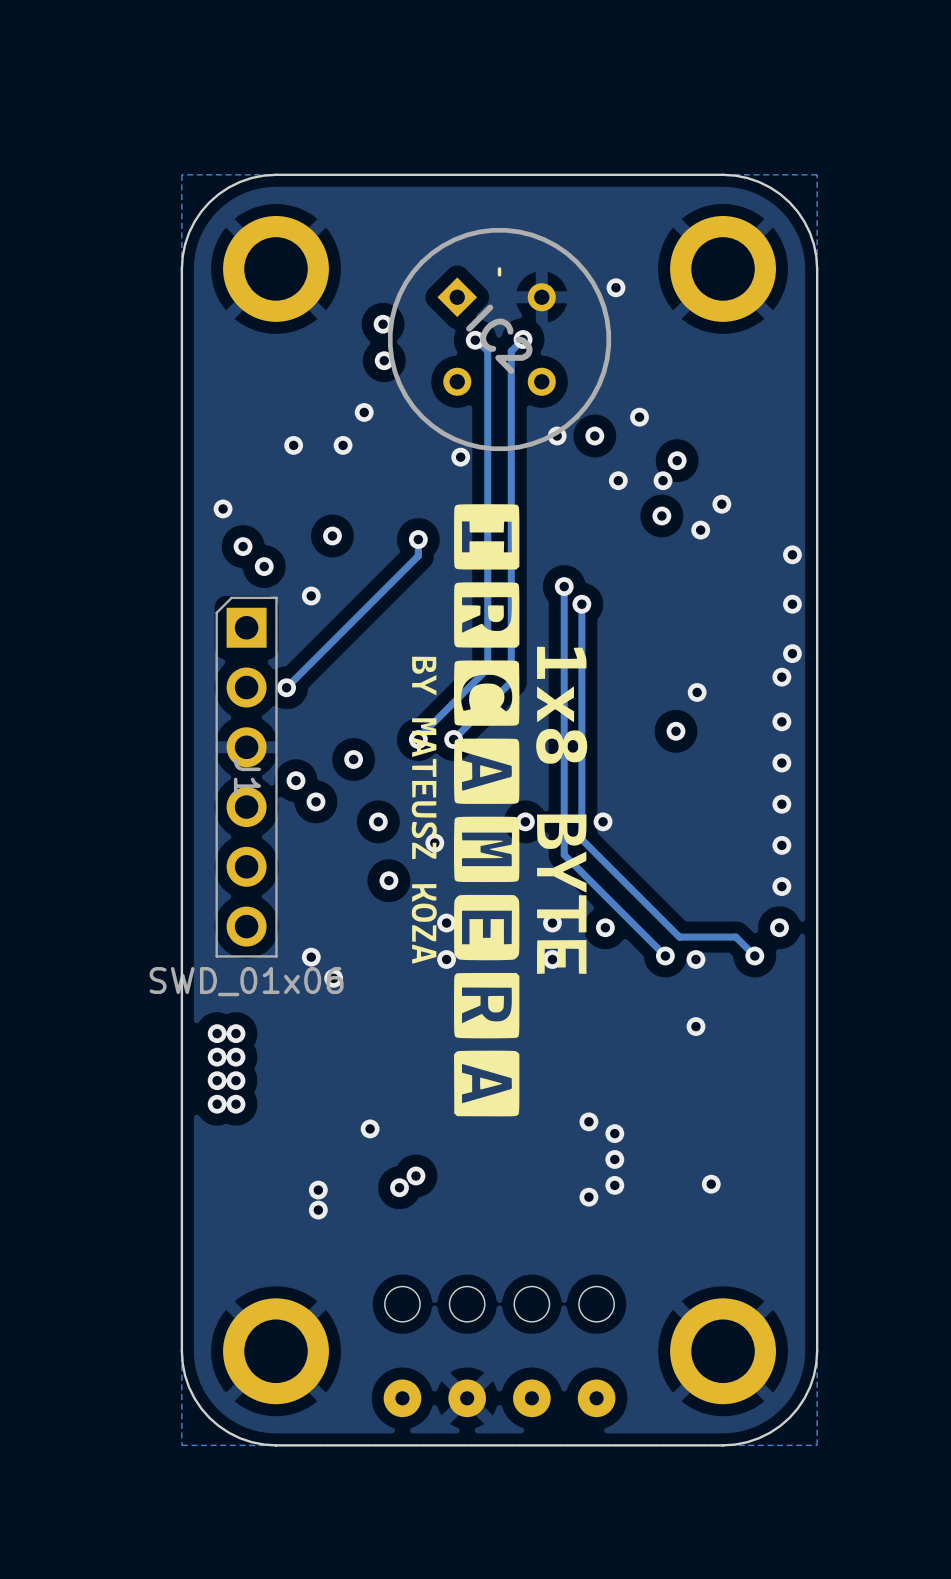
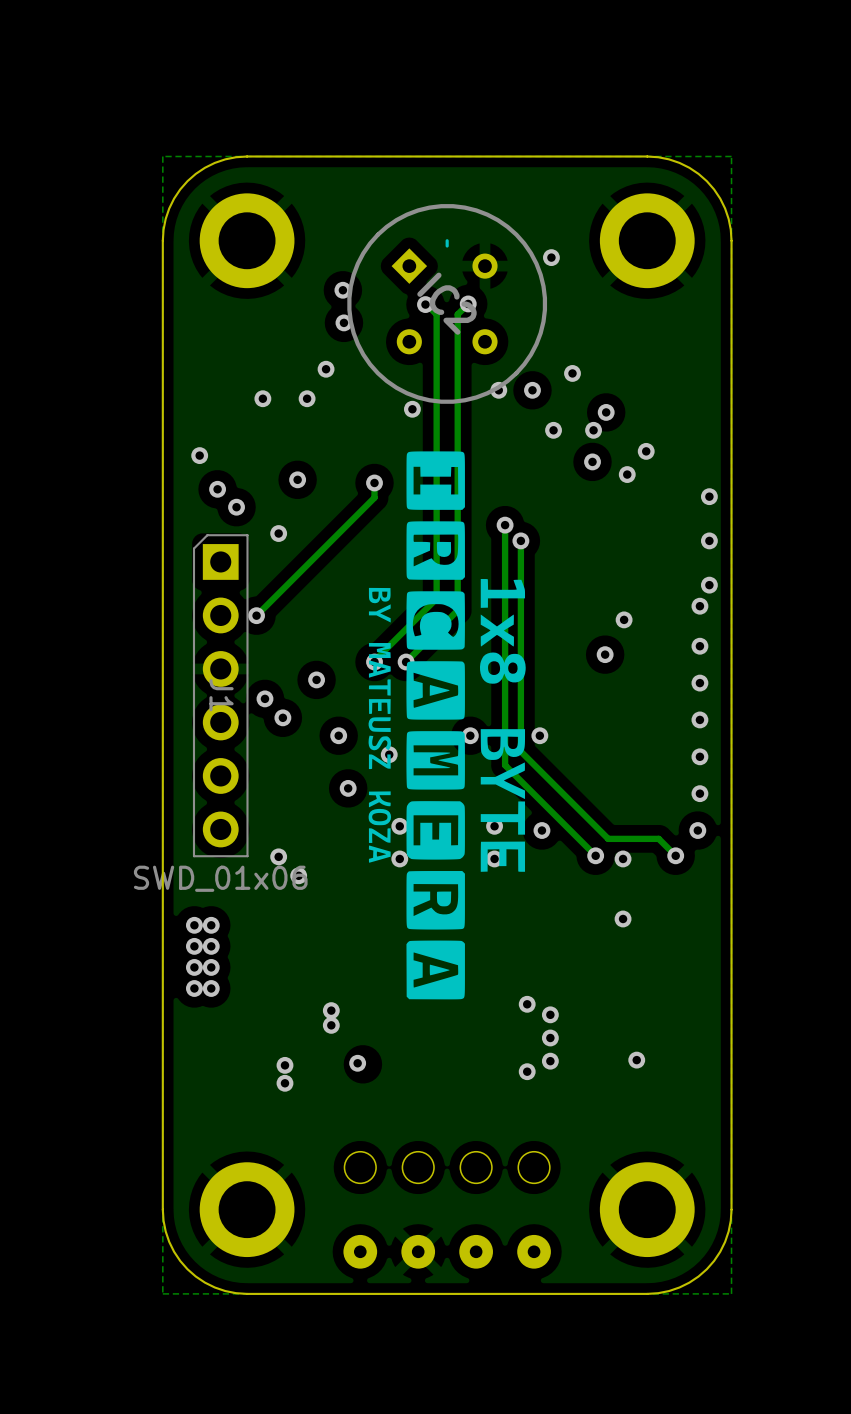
via position: (415, 1175) -> (331, 1025)

